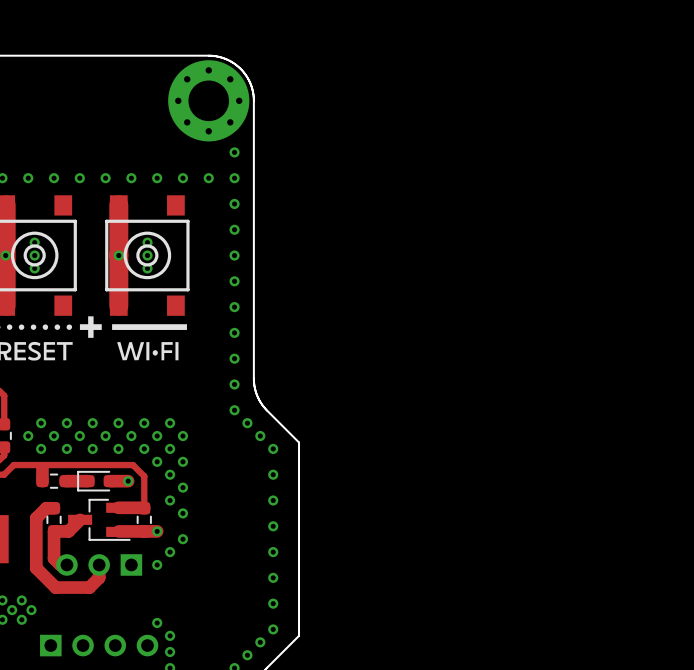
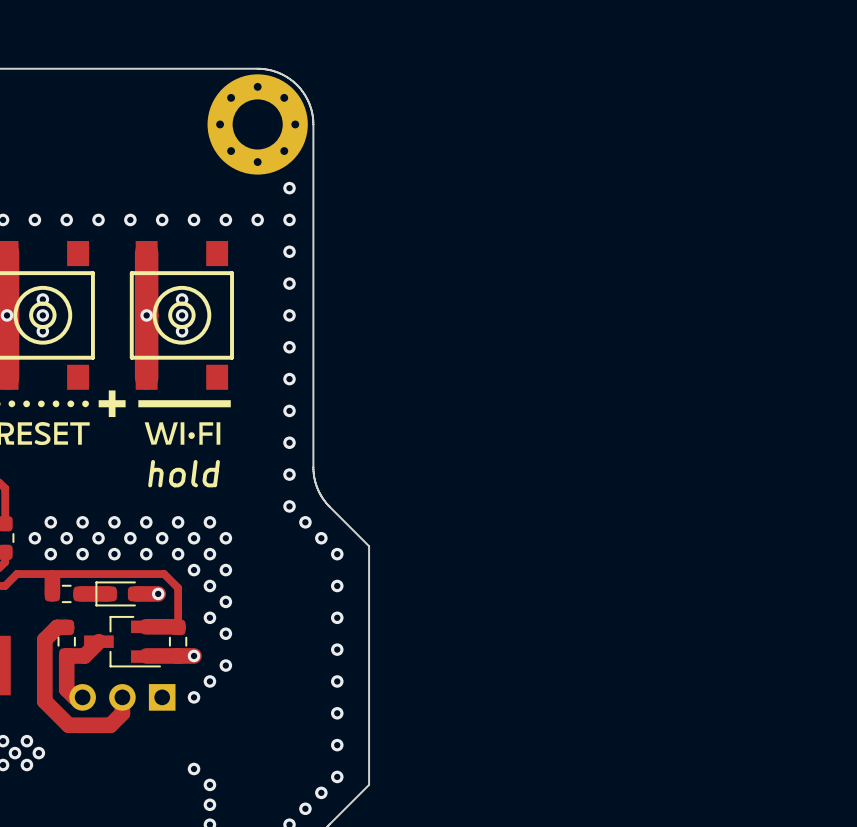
text: none -> hold (184, 473)
part: (99, 645) -> none

